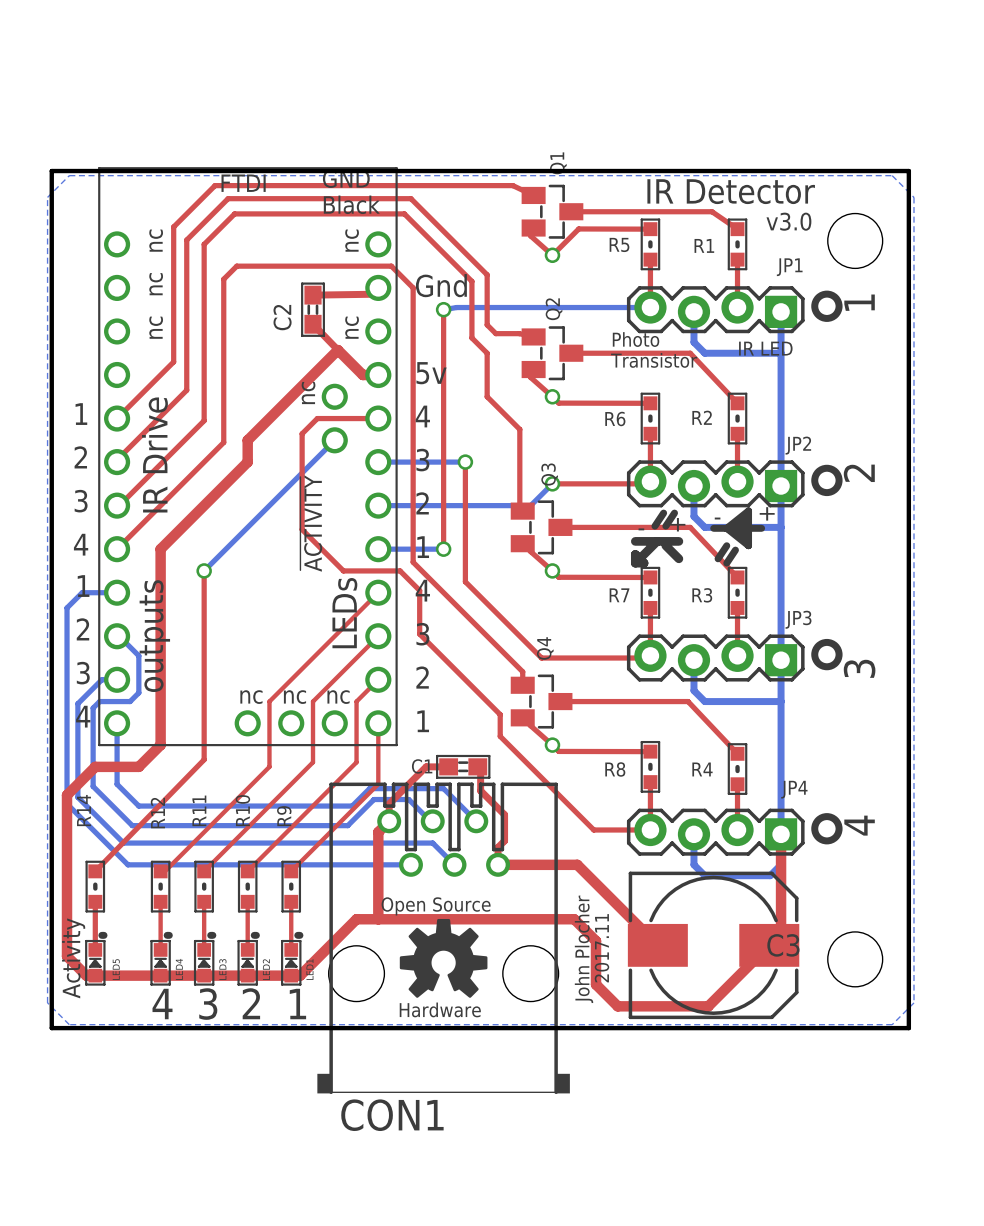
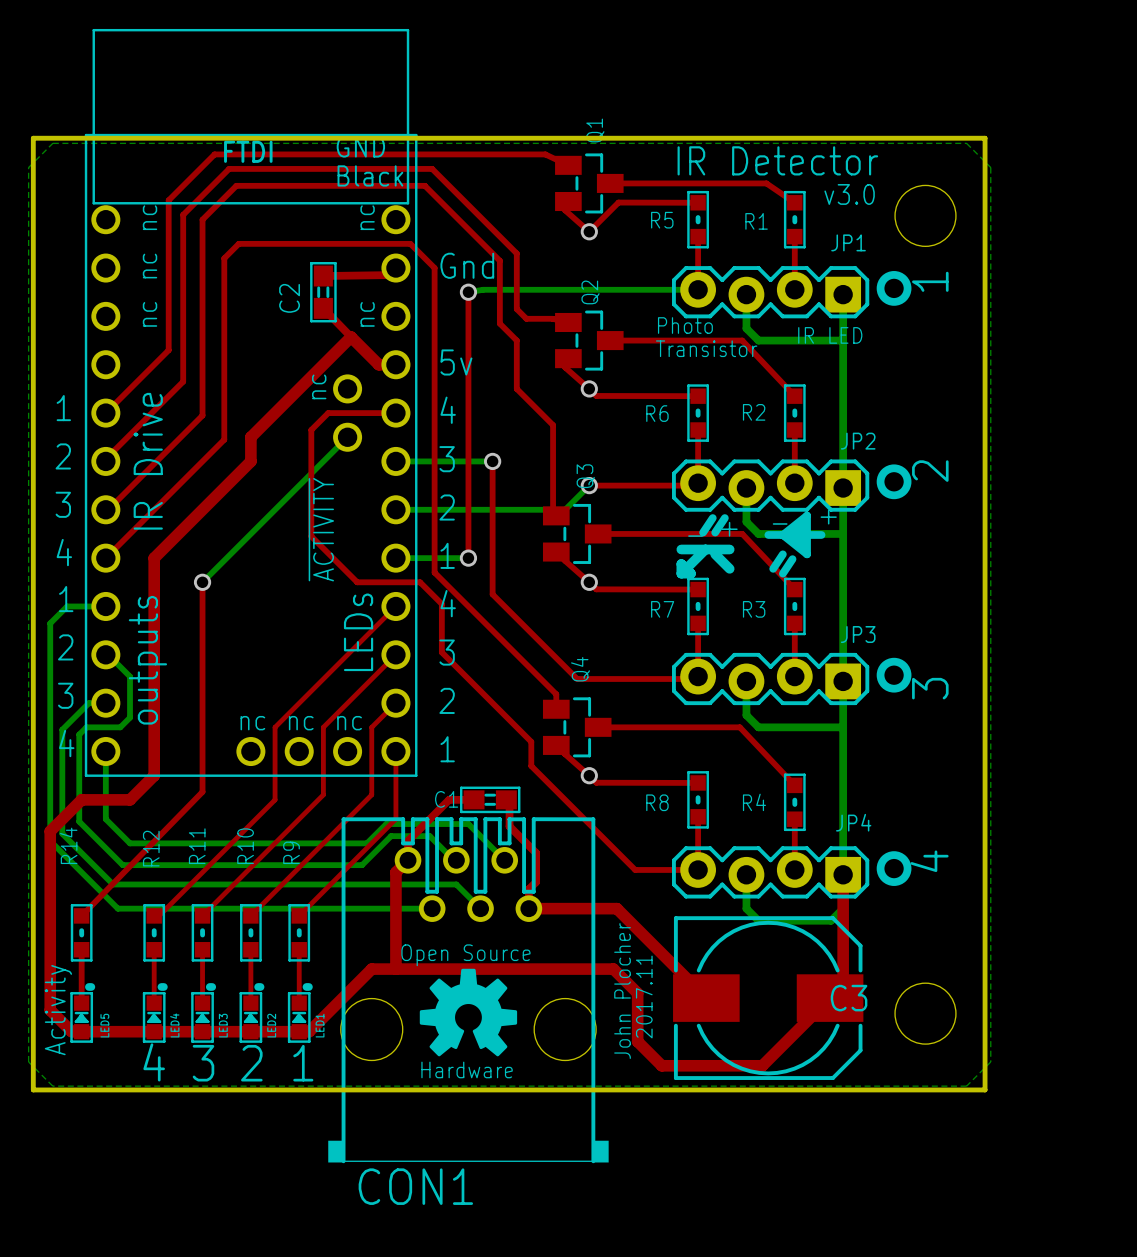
part: none -> (251, 402)
part: (247, 456) -> none

